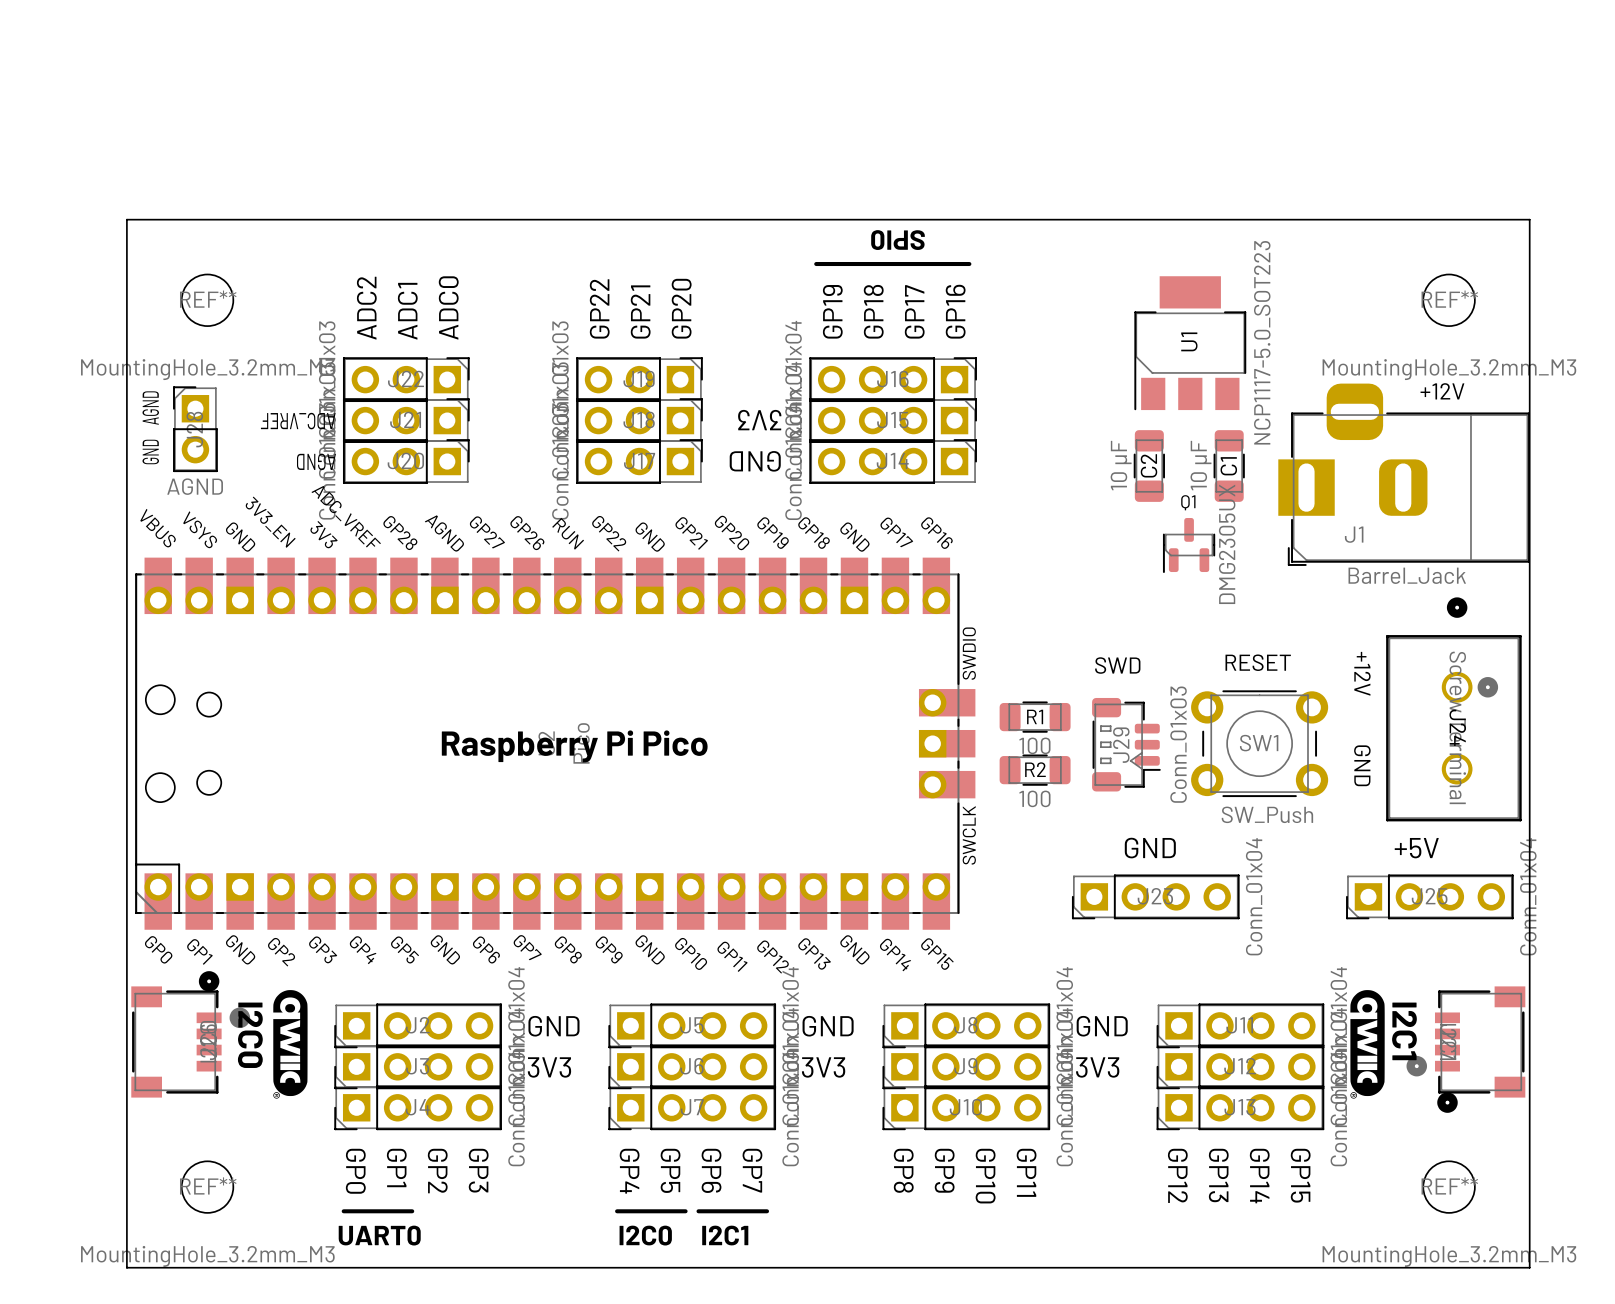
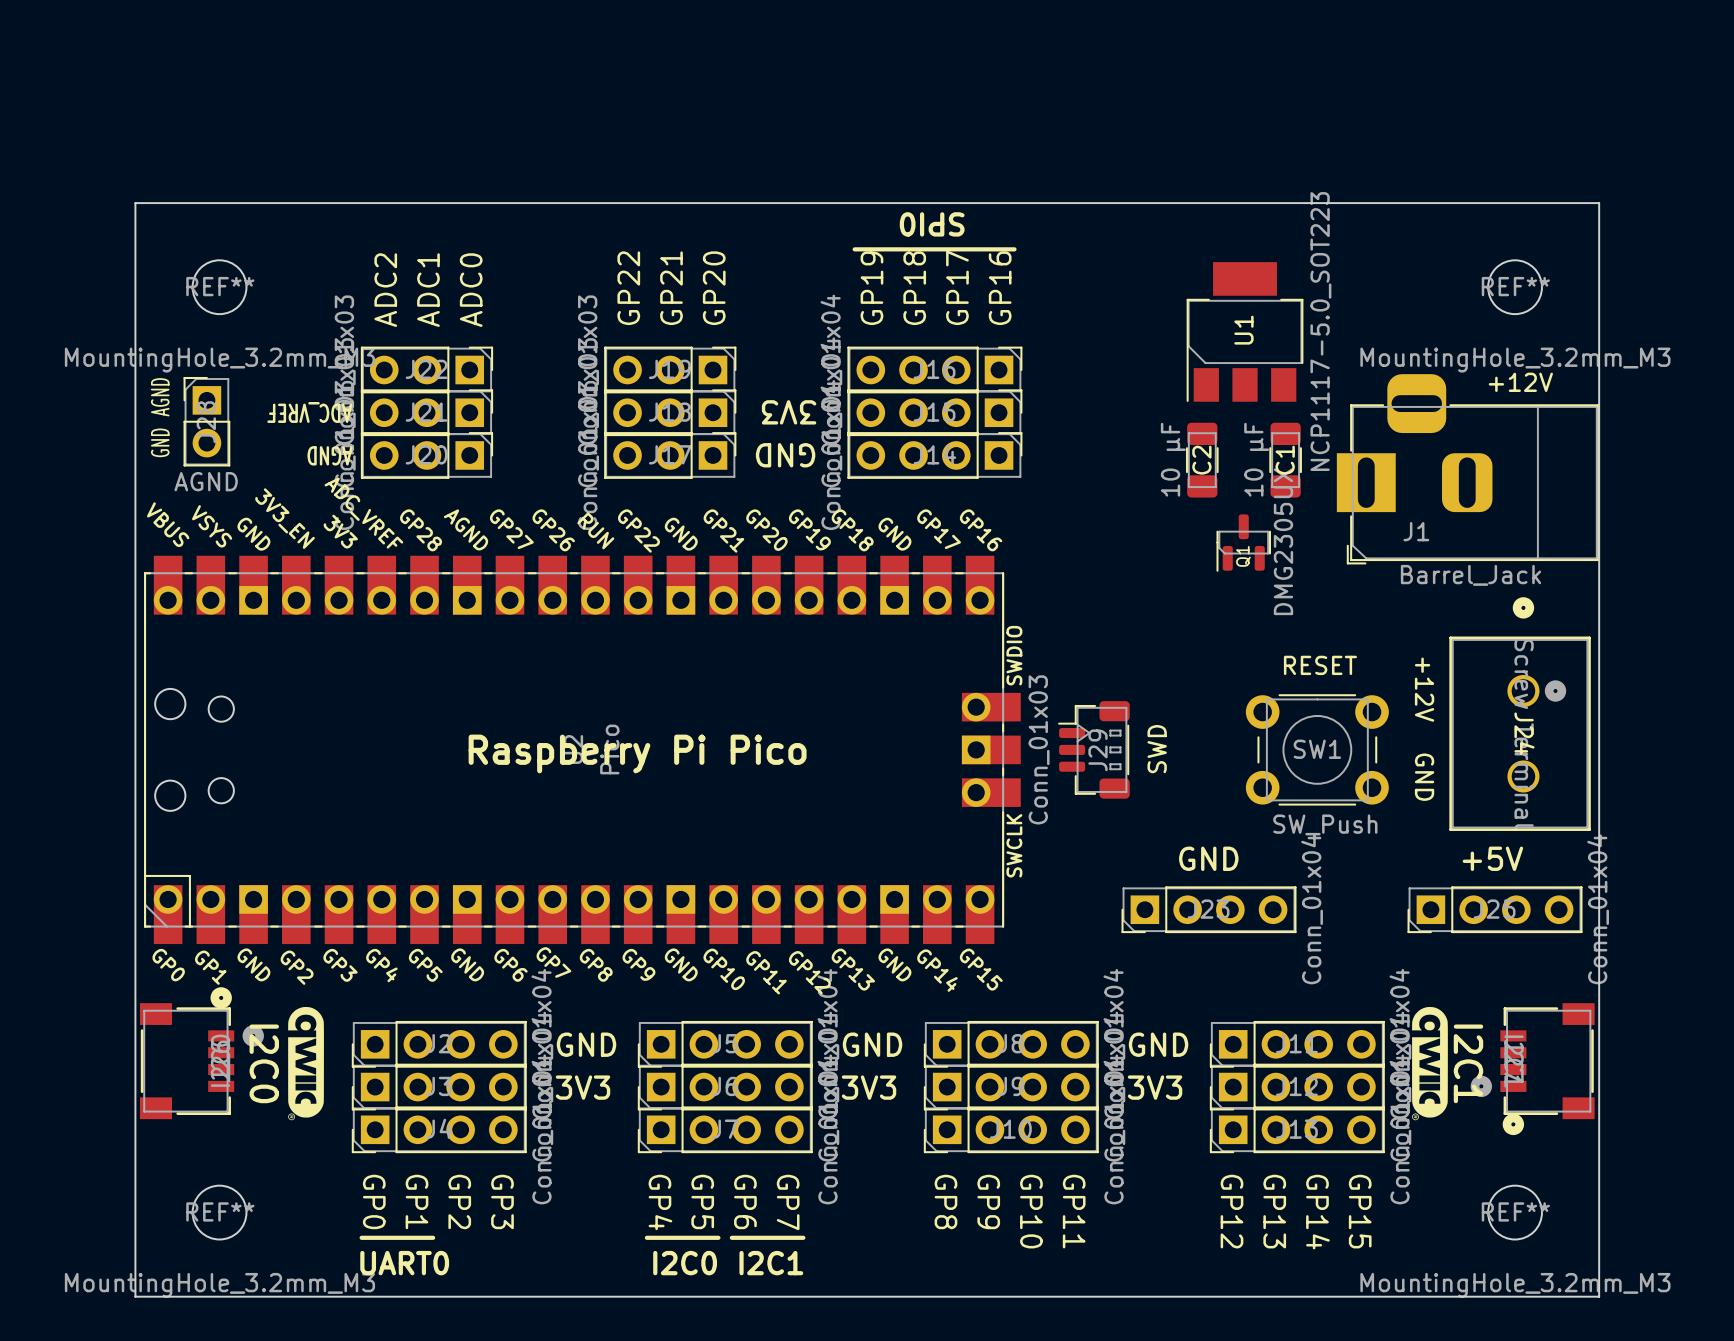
Q1 name rotation: 0° (1188, 502) -> 90° counterclockwise (1243, 556)
Q1 name position: Q1 (1188, 502) -> Q1 (1243, 556)
text rotation: 0° (1117, 665) -> 90° counterclockwise (1157, 749)
text position: SWD (1117, 665) -> SWD (1157, 749)
R1: 100 (1035, 717) -> none
J29 rotation: 0° (1126, 744) -> 180° (1093, 749)
J29 position: (1126, 744) -> (1093, 749)
R2: 100 (1035, 770) -> none

